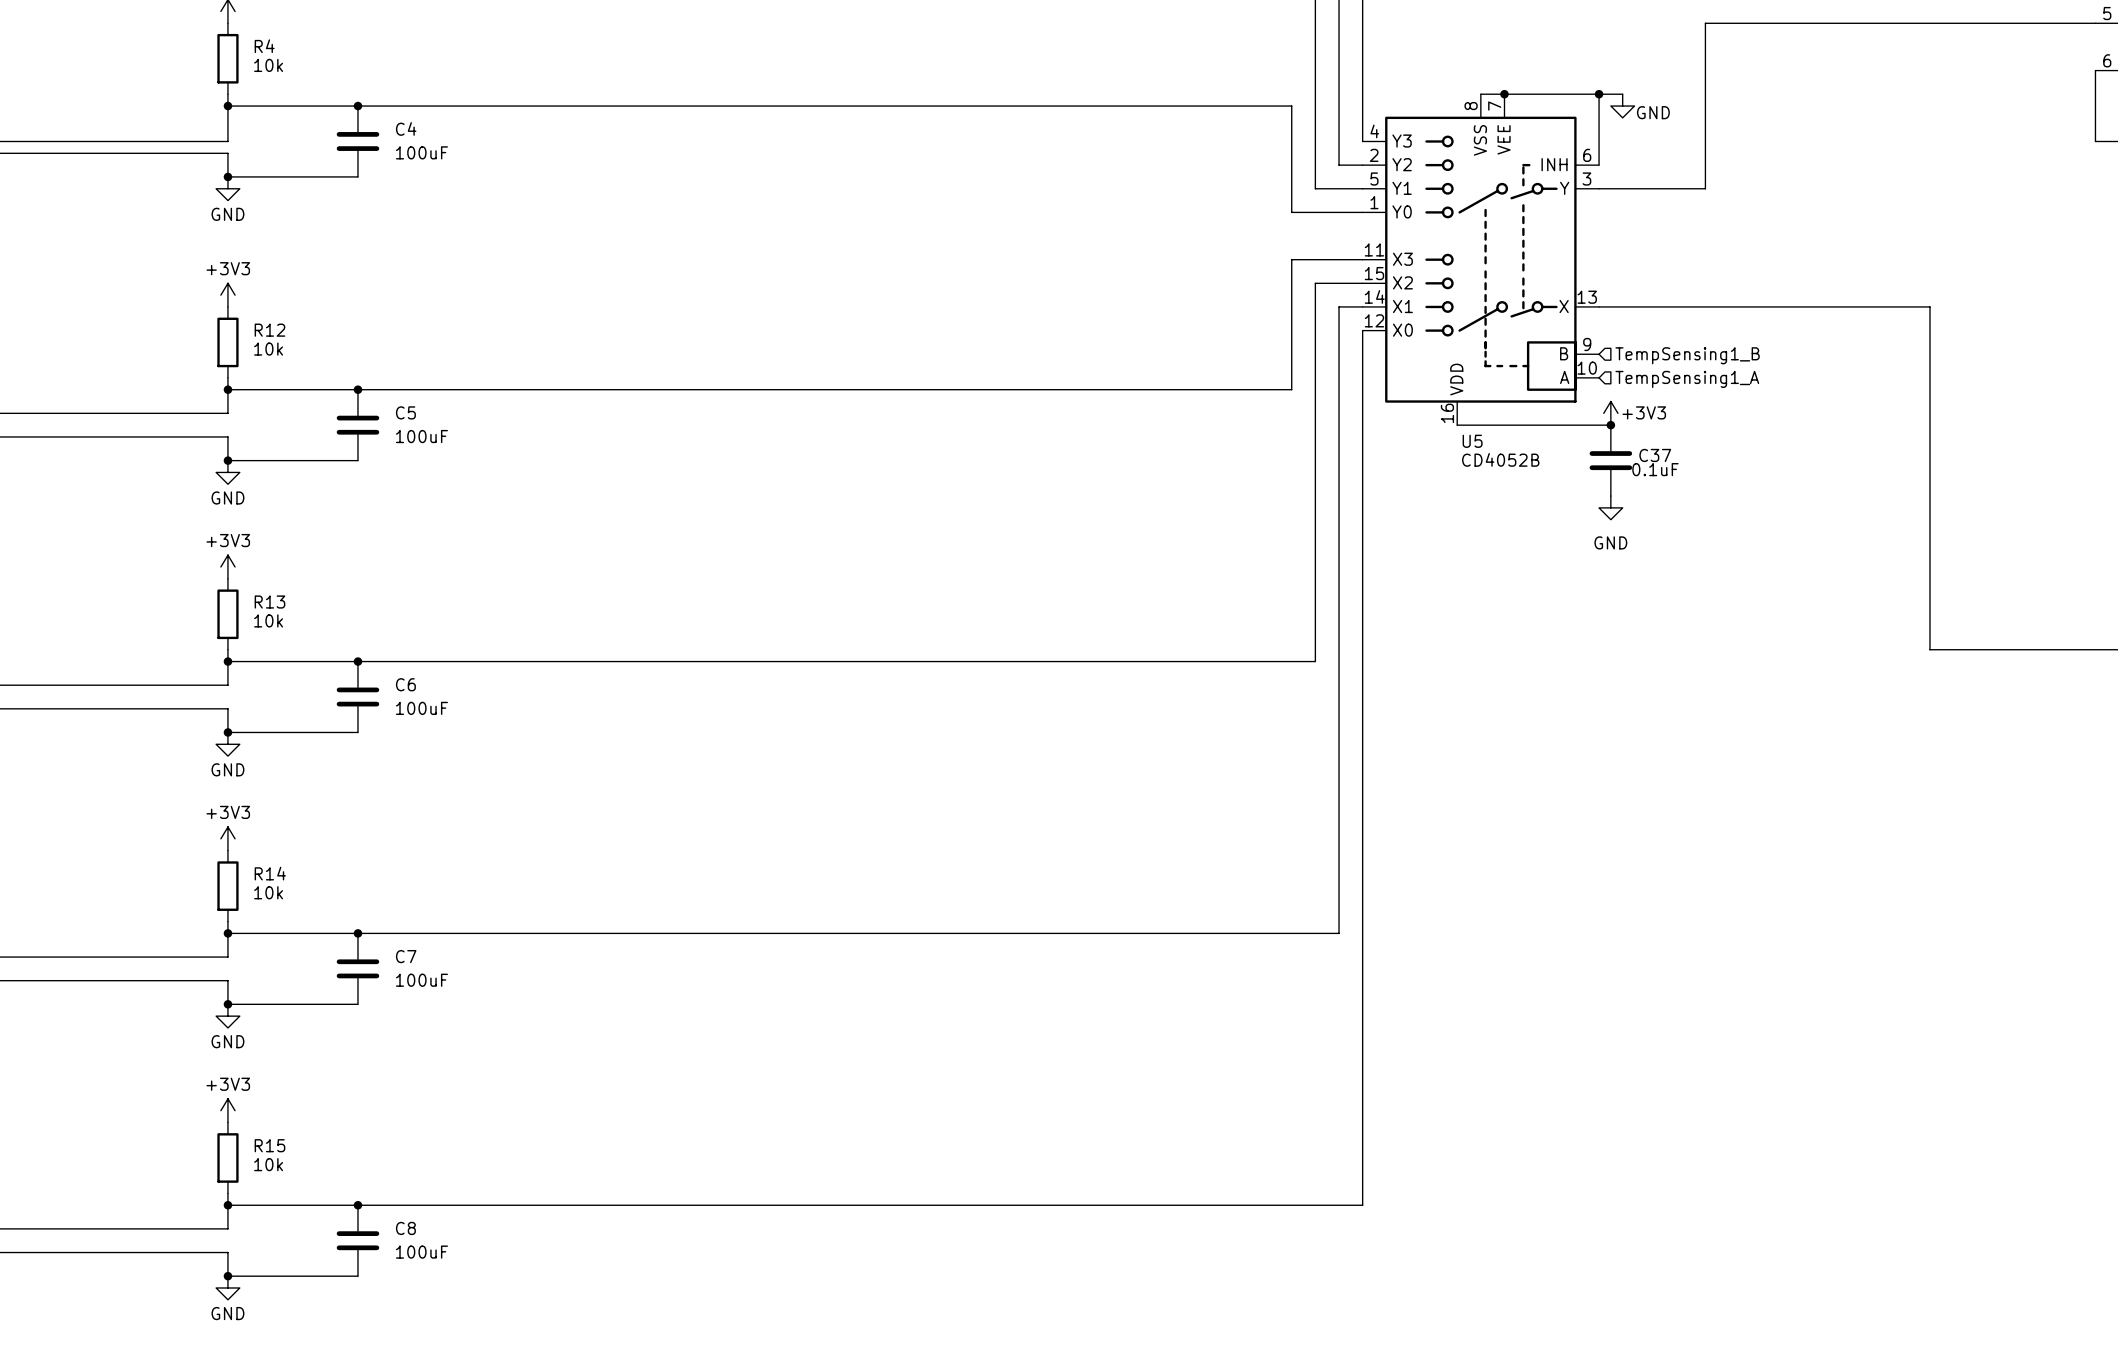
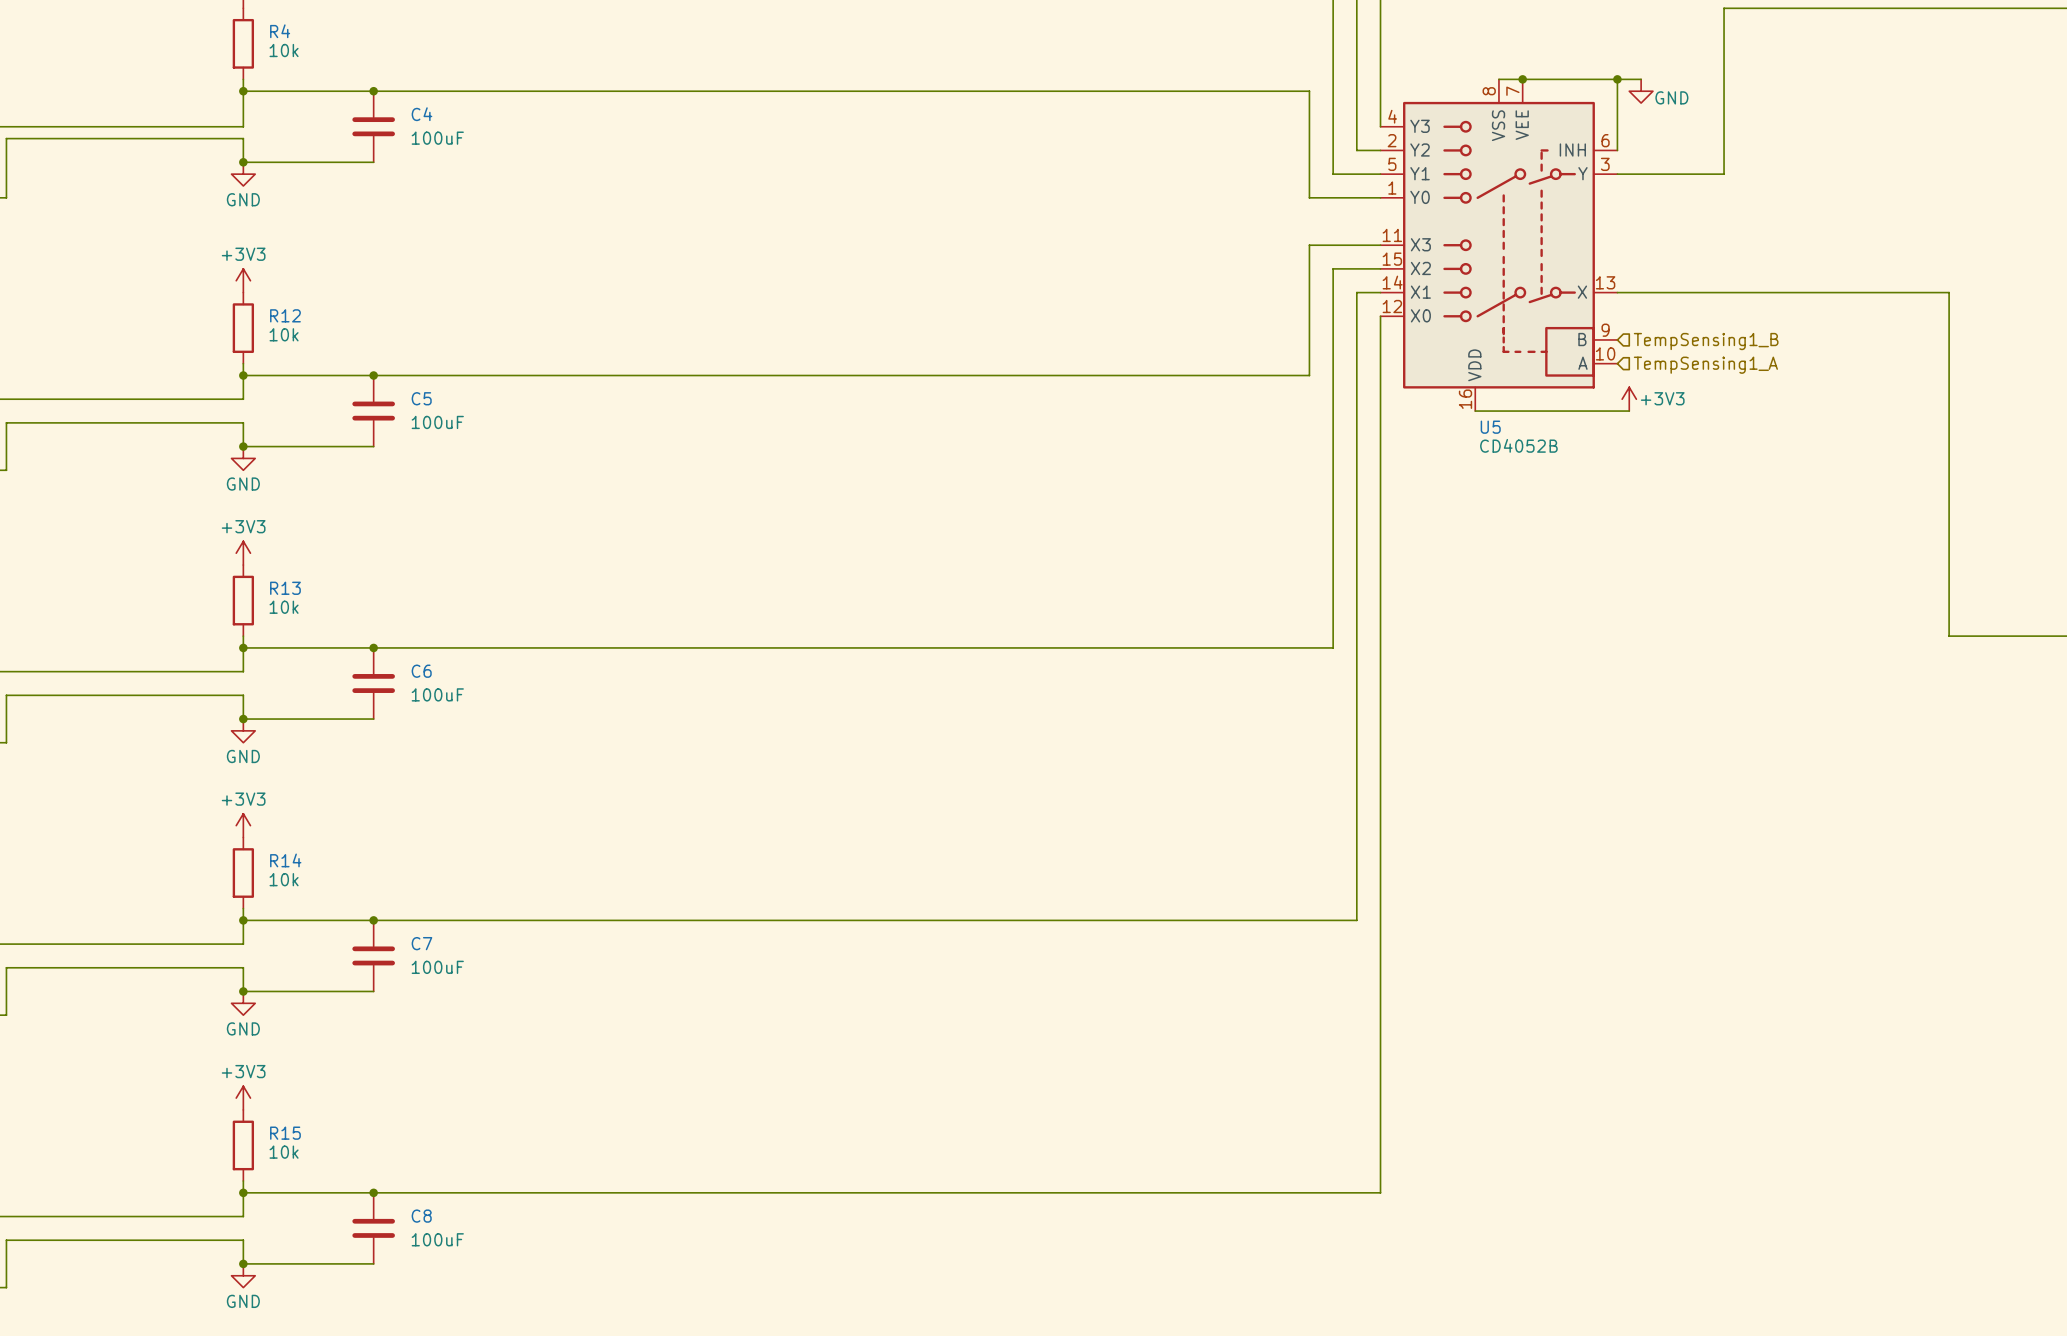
junction: (1610, 425) -> none
C37: 0.1uF (1610, 460) -> none
power symbol: GND (1610, 507) -> none

